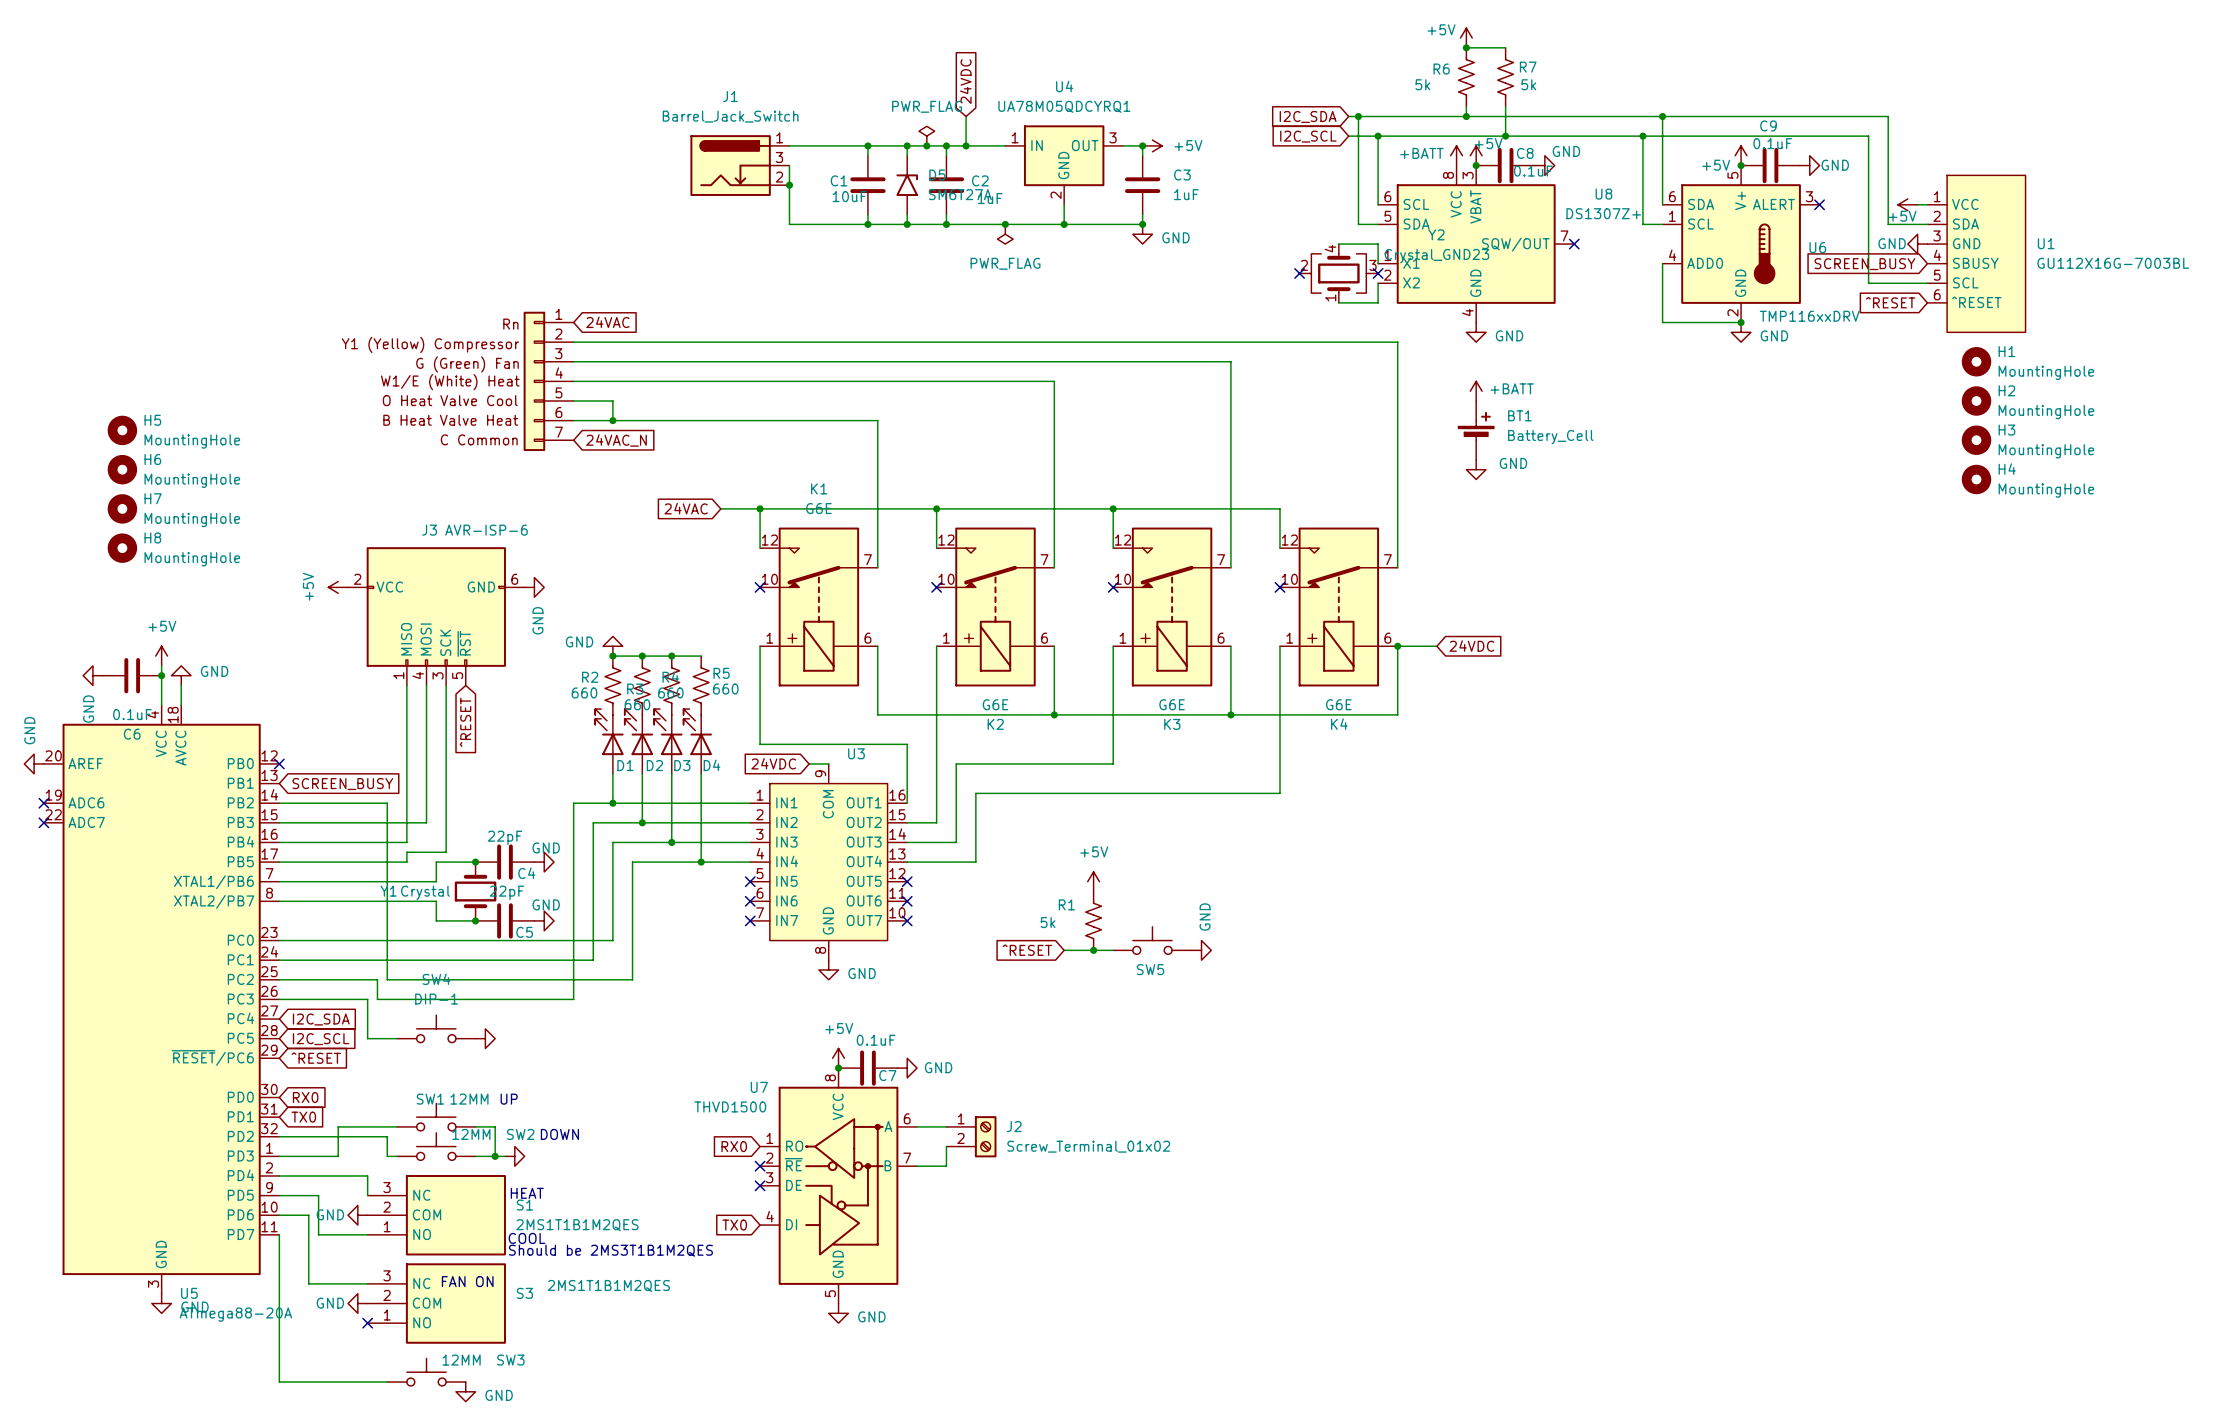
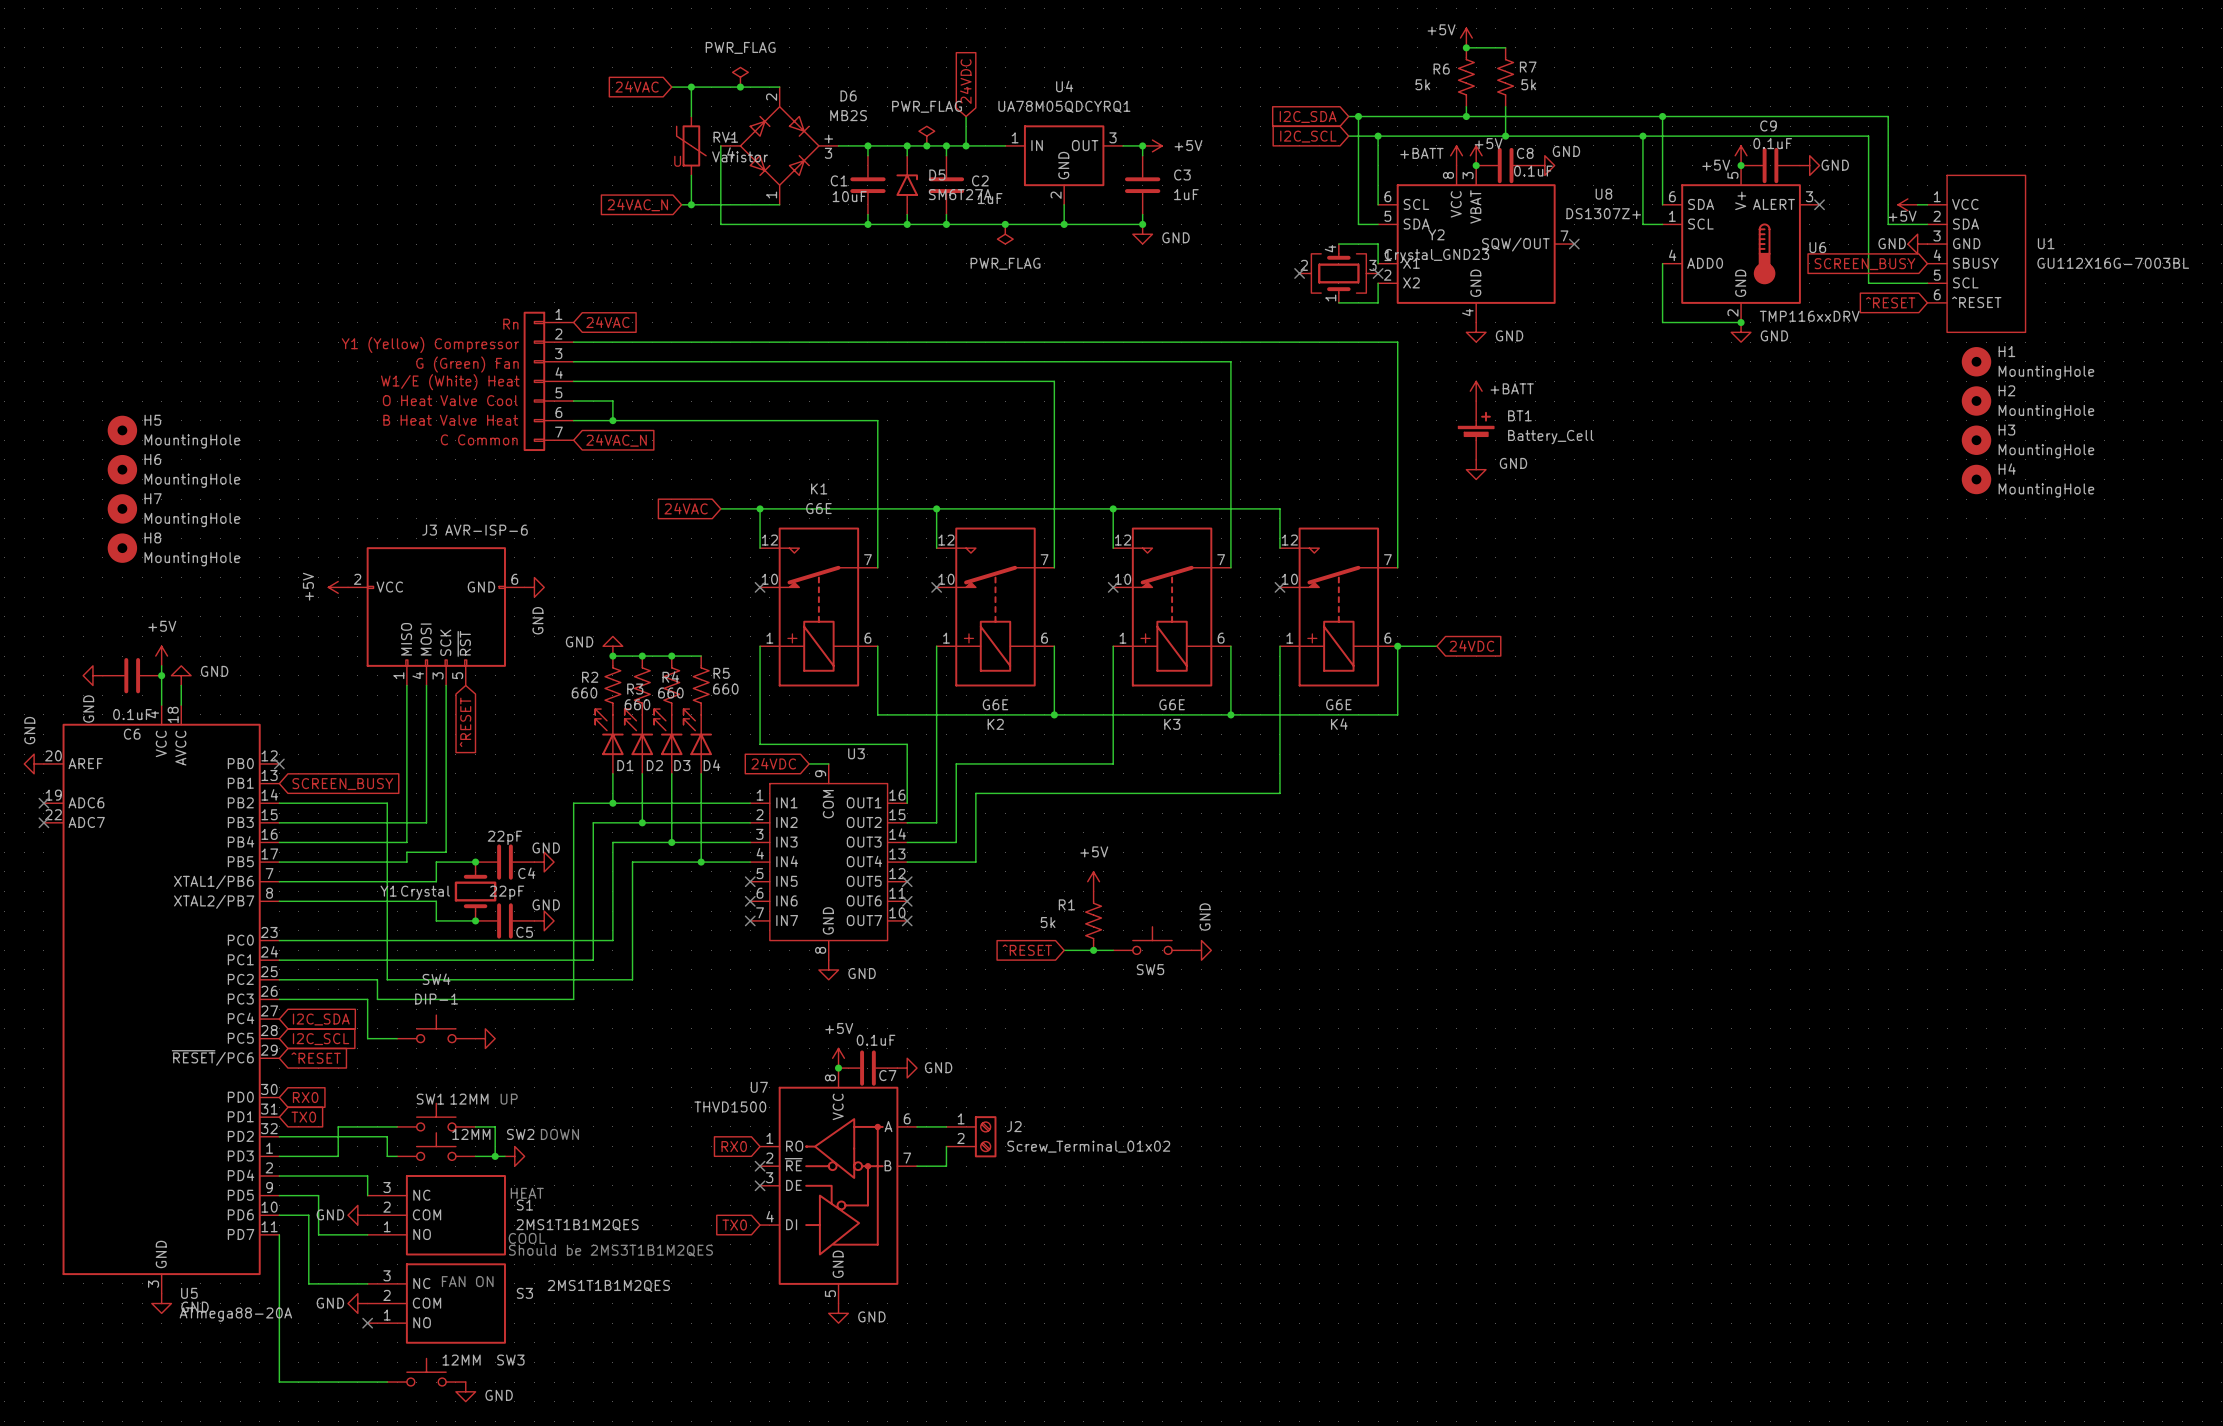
power symbol: none -> PWR_FLAG (740, 77)
global label: none -> 24VAC (637, 86)
wire: none -> (671, 87) (779, 87)
wire: none -> (691, 87) (691, 116)
junction: none -> (691, 87)
junction: none -> (740, 87)
RV1: none -> Varistor (691, 145)
D6: none -> MB2S (779, 145)
wire: (789, 145) (838, 145) -> none
J1: Barrel_Jack_Switch (739, 165) -> none
wire: (789, 165) (789, 224) -> (720, 145) (720, 224) (789, 224)
junction: (789, 185) -> none
wire: none -> (681, 204) (779, 204)
junction: none -> (691, 204)
global label: none -> 24VAC_N (637, 205)

